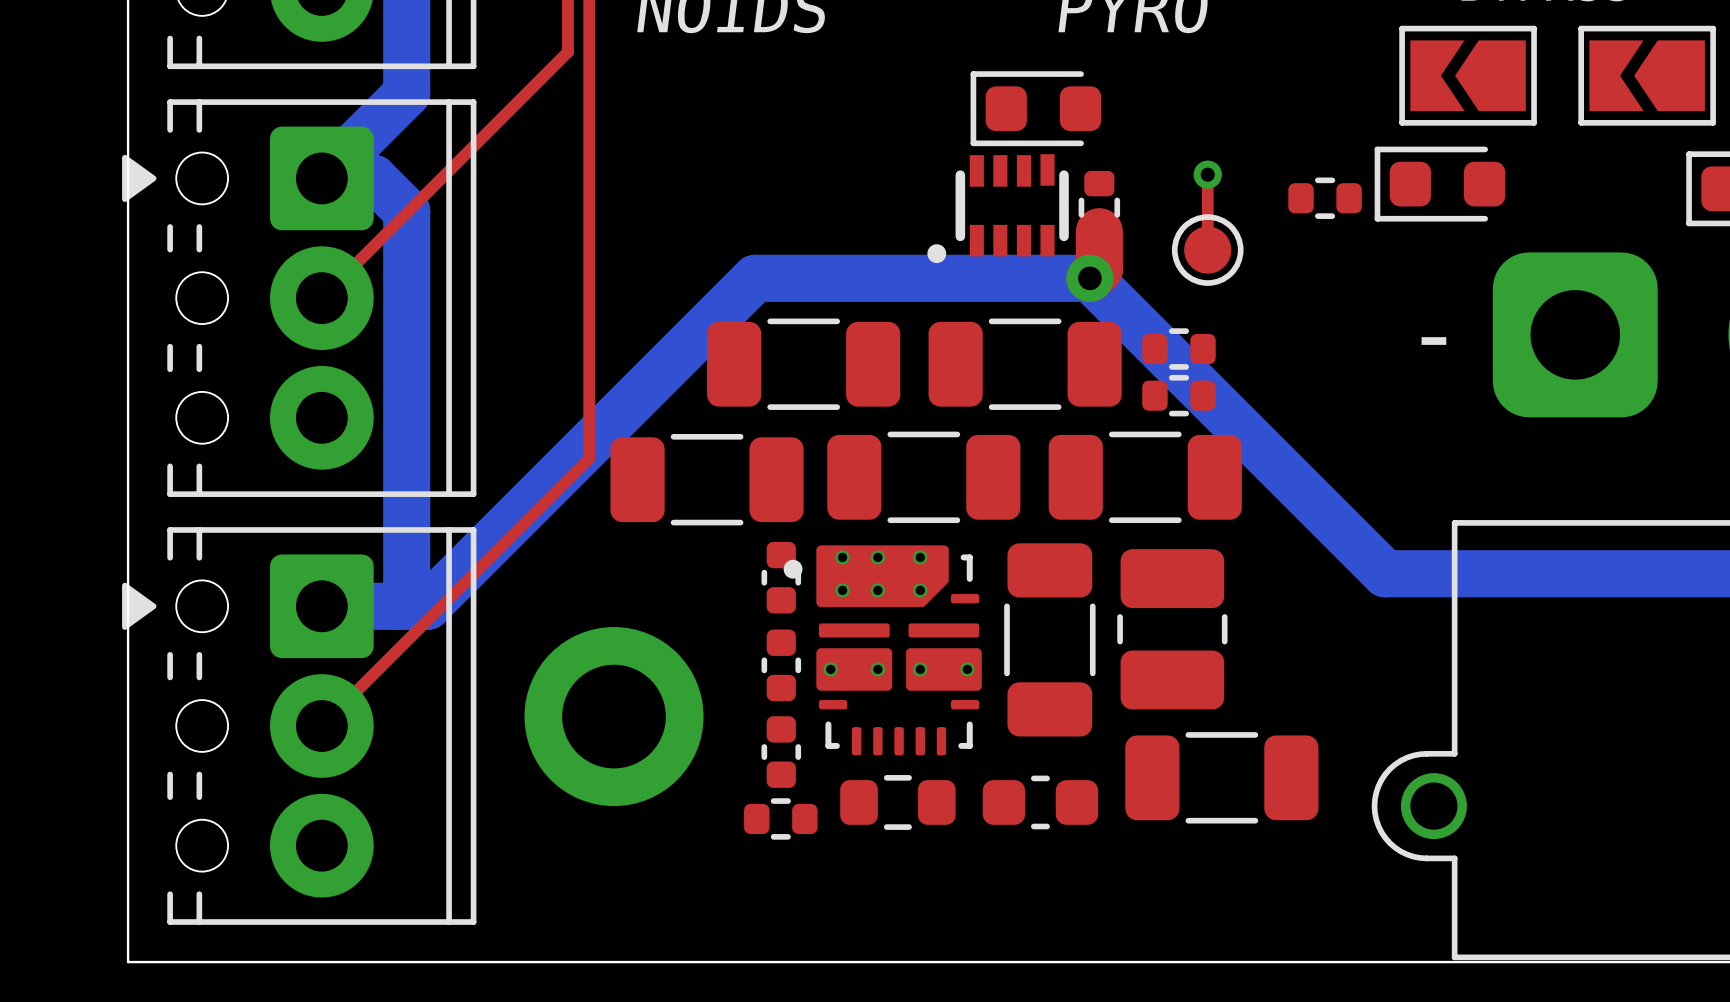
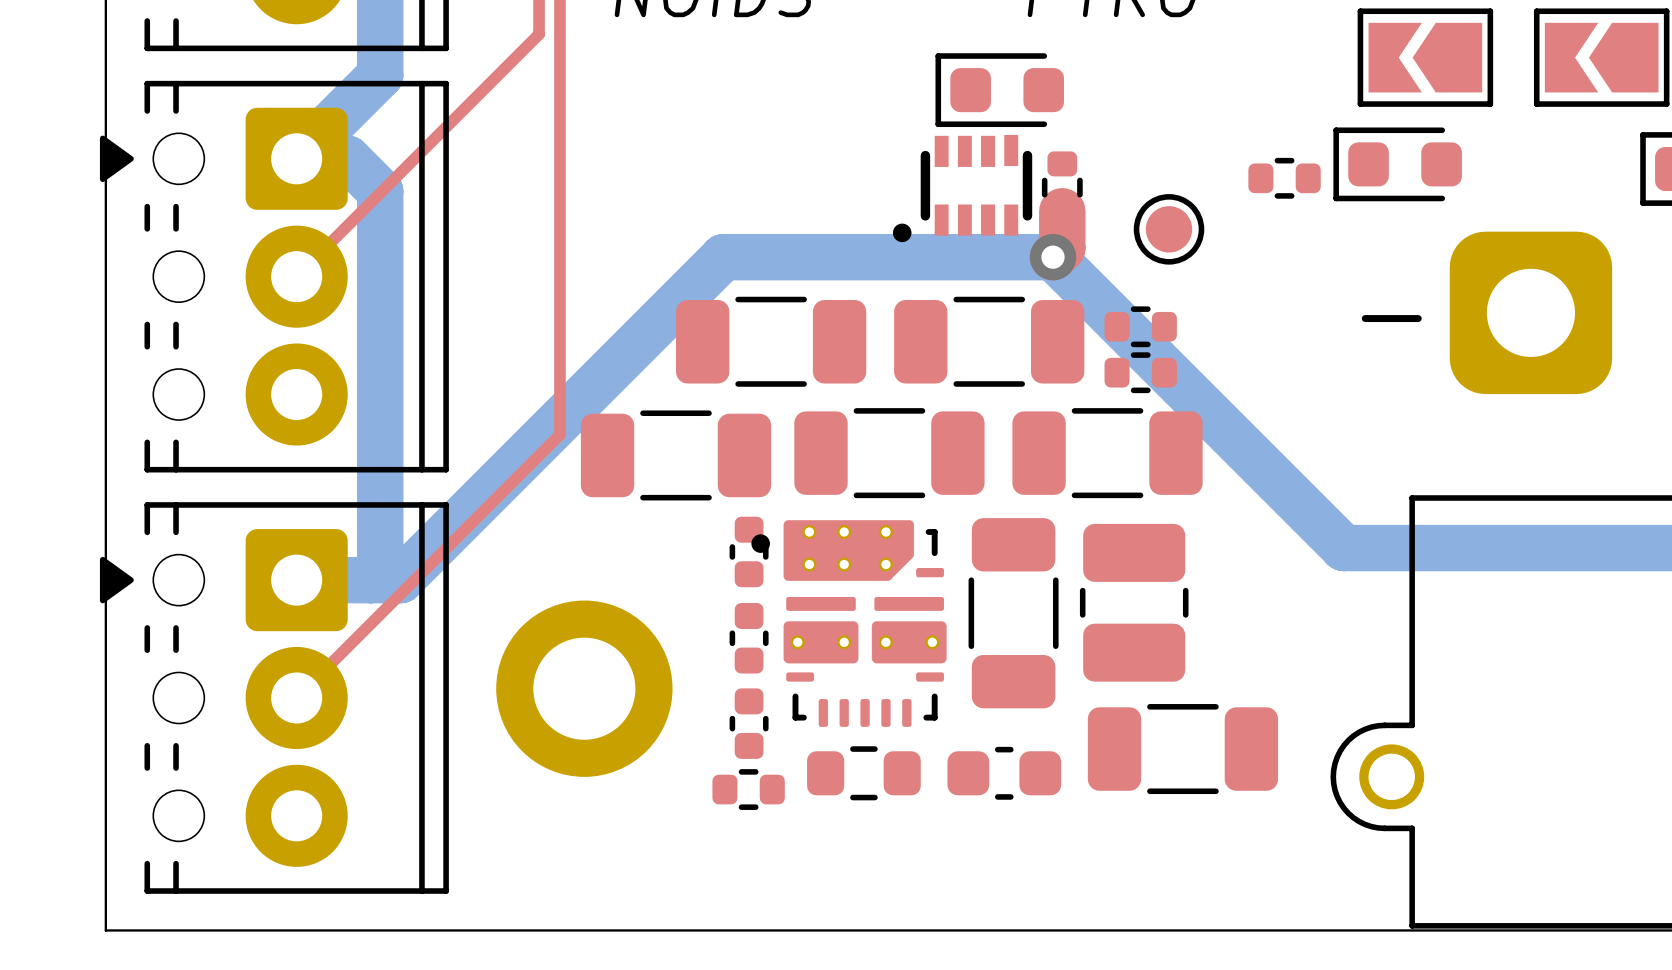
top track: (1207, 174) (1207, 250) -> none
via: (1207, 174) -> none

